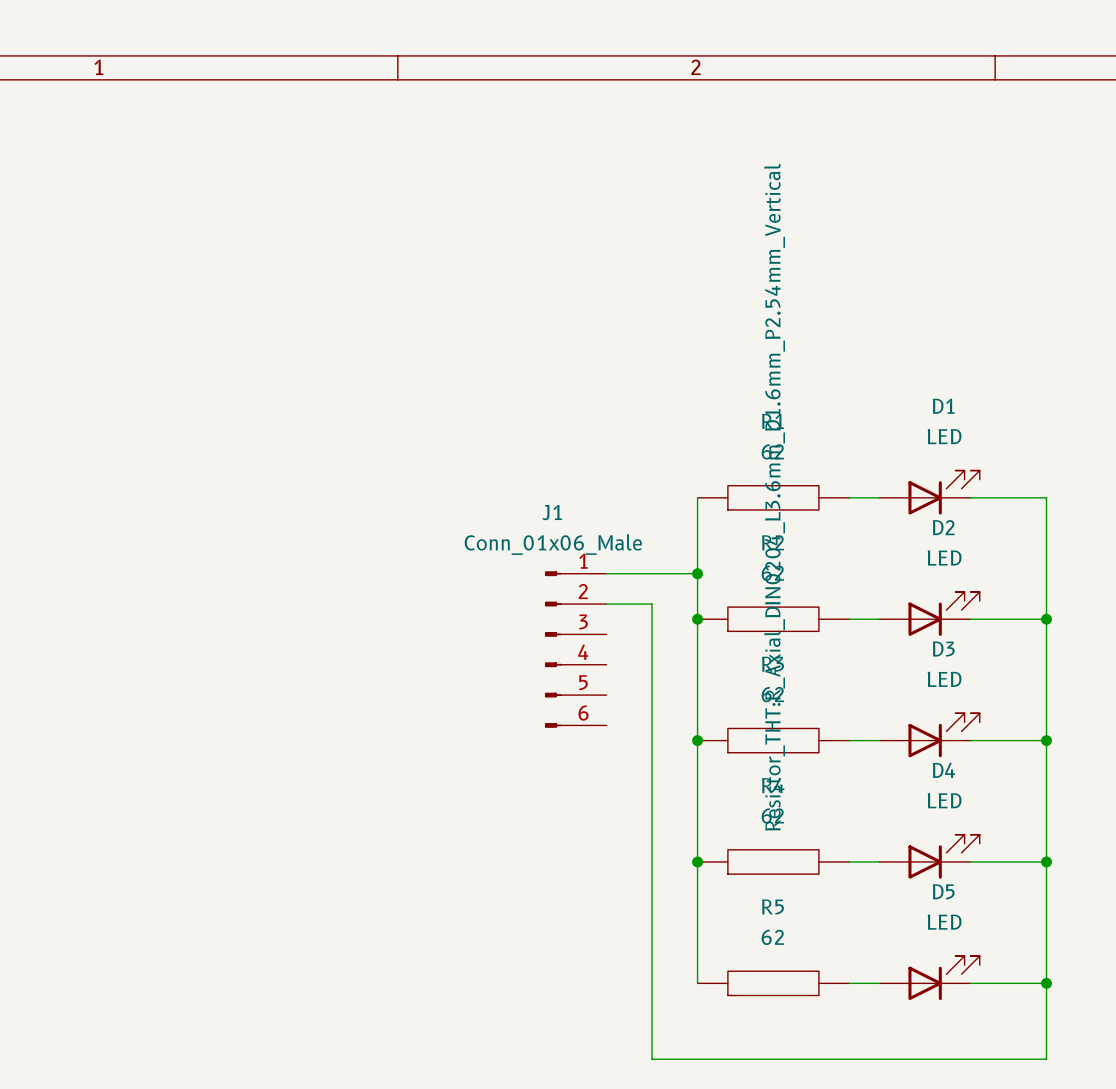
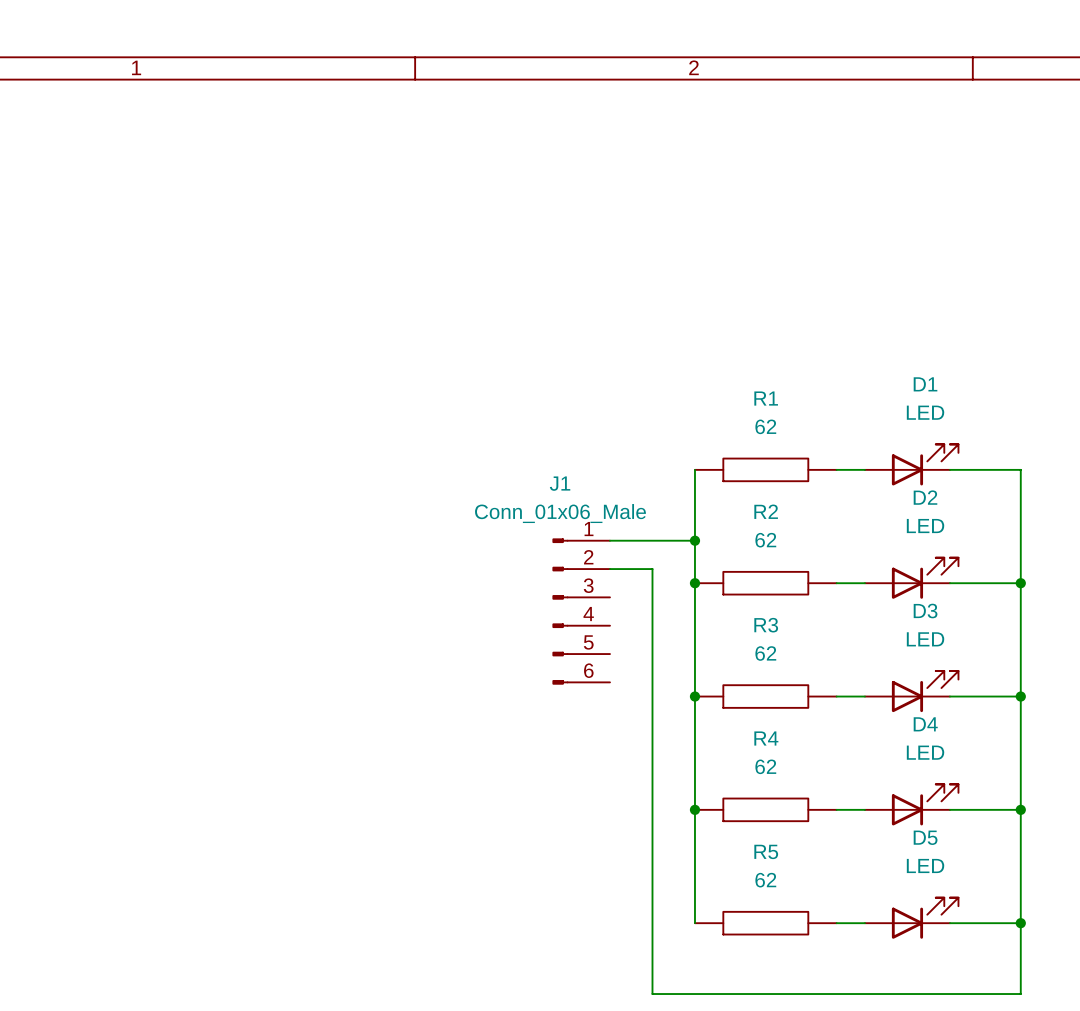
R1 text: Resistor_THT:R_Axial_DIN0204_L3.6mm_D1.6mm_P2.54mm_Vertical (774, 497) -> none

